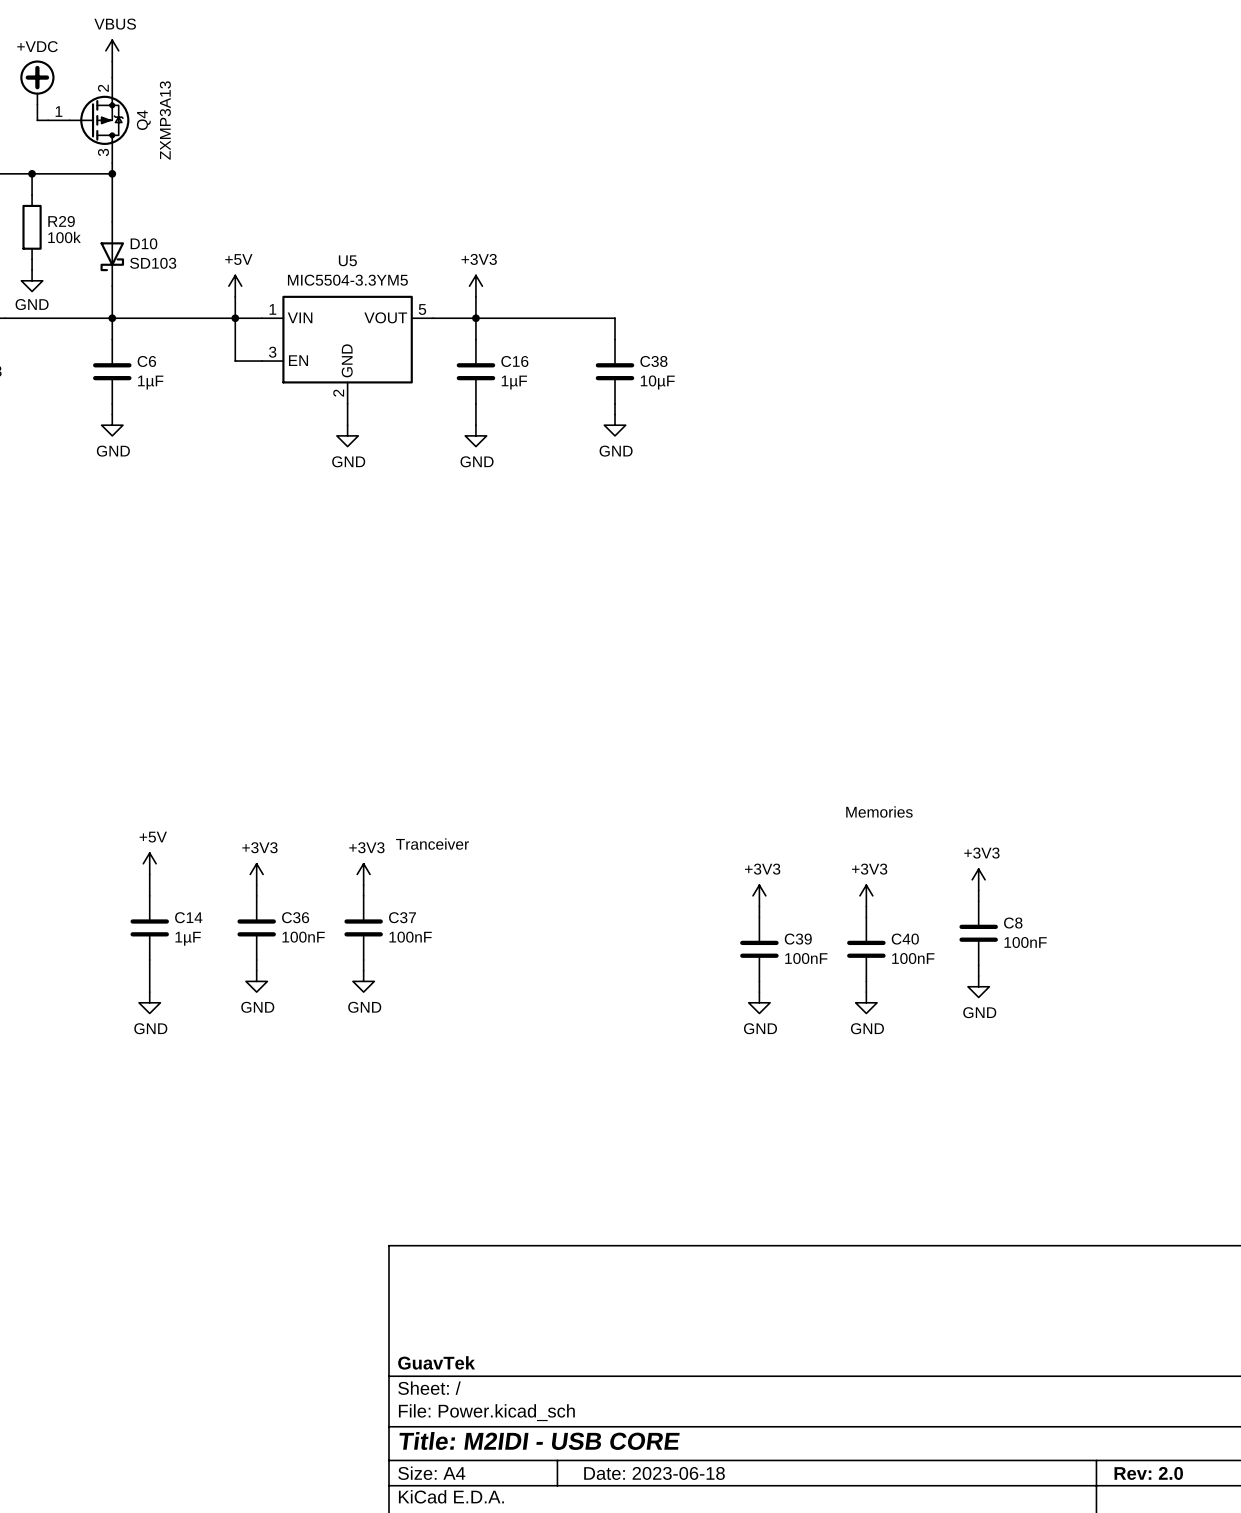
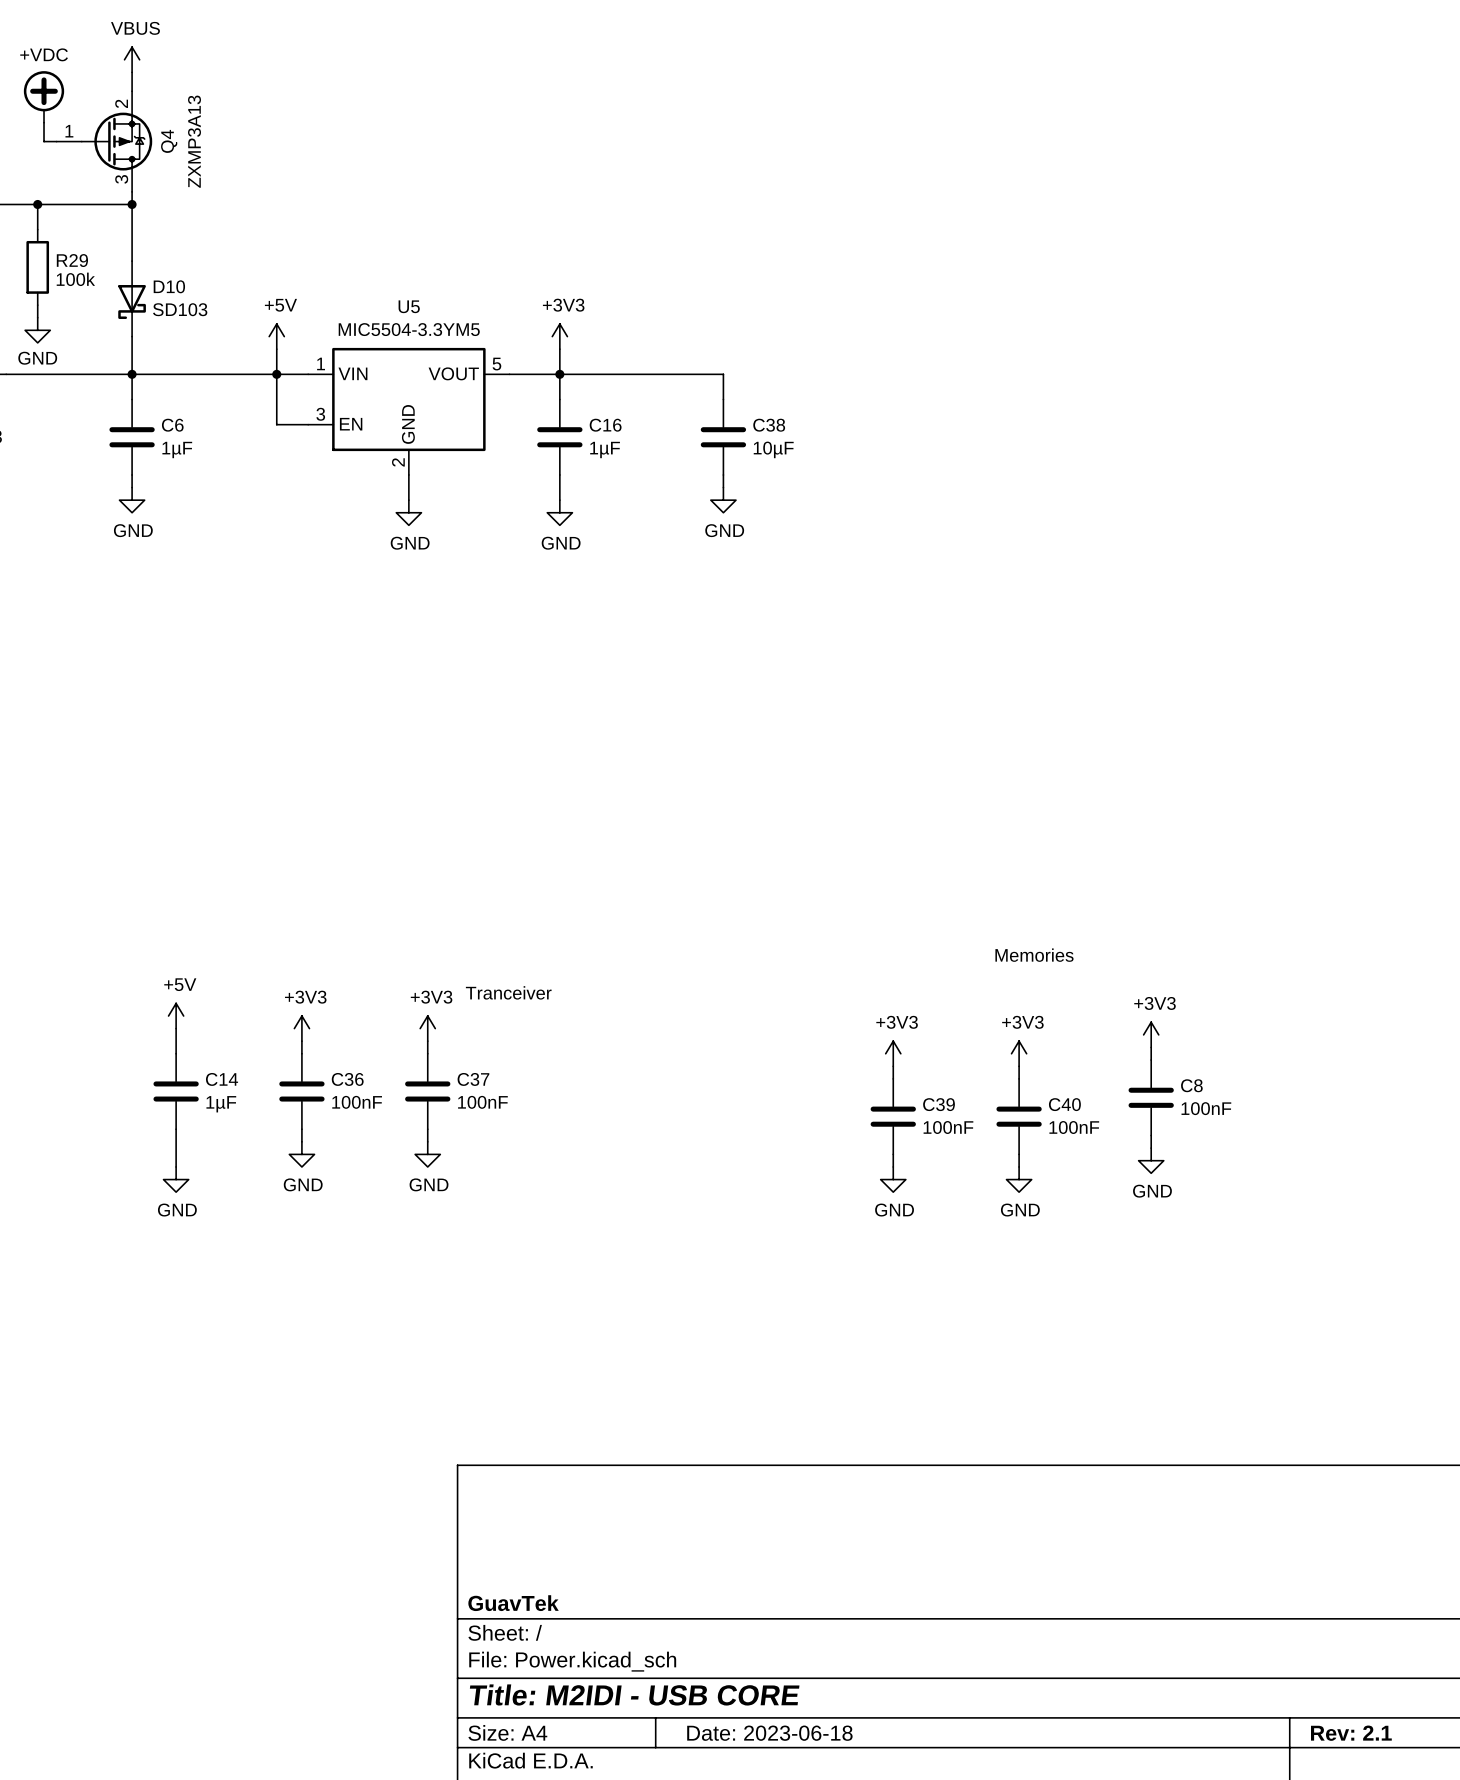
title block: Rev: 2.0 (1148, 1473) -> Rev: 2.1 (1351, 1733)

